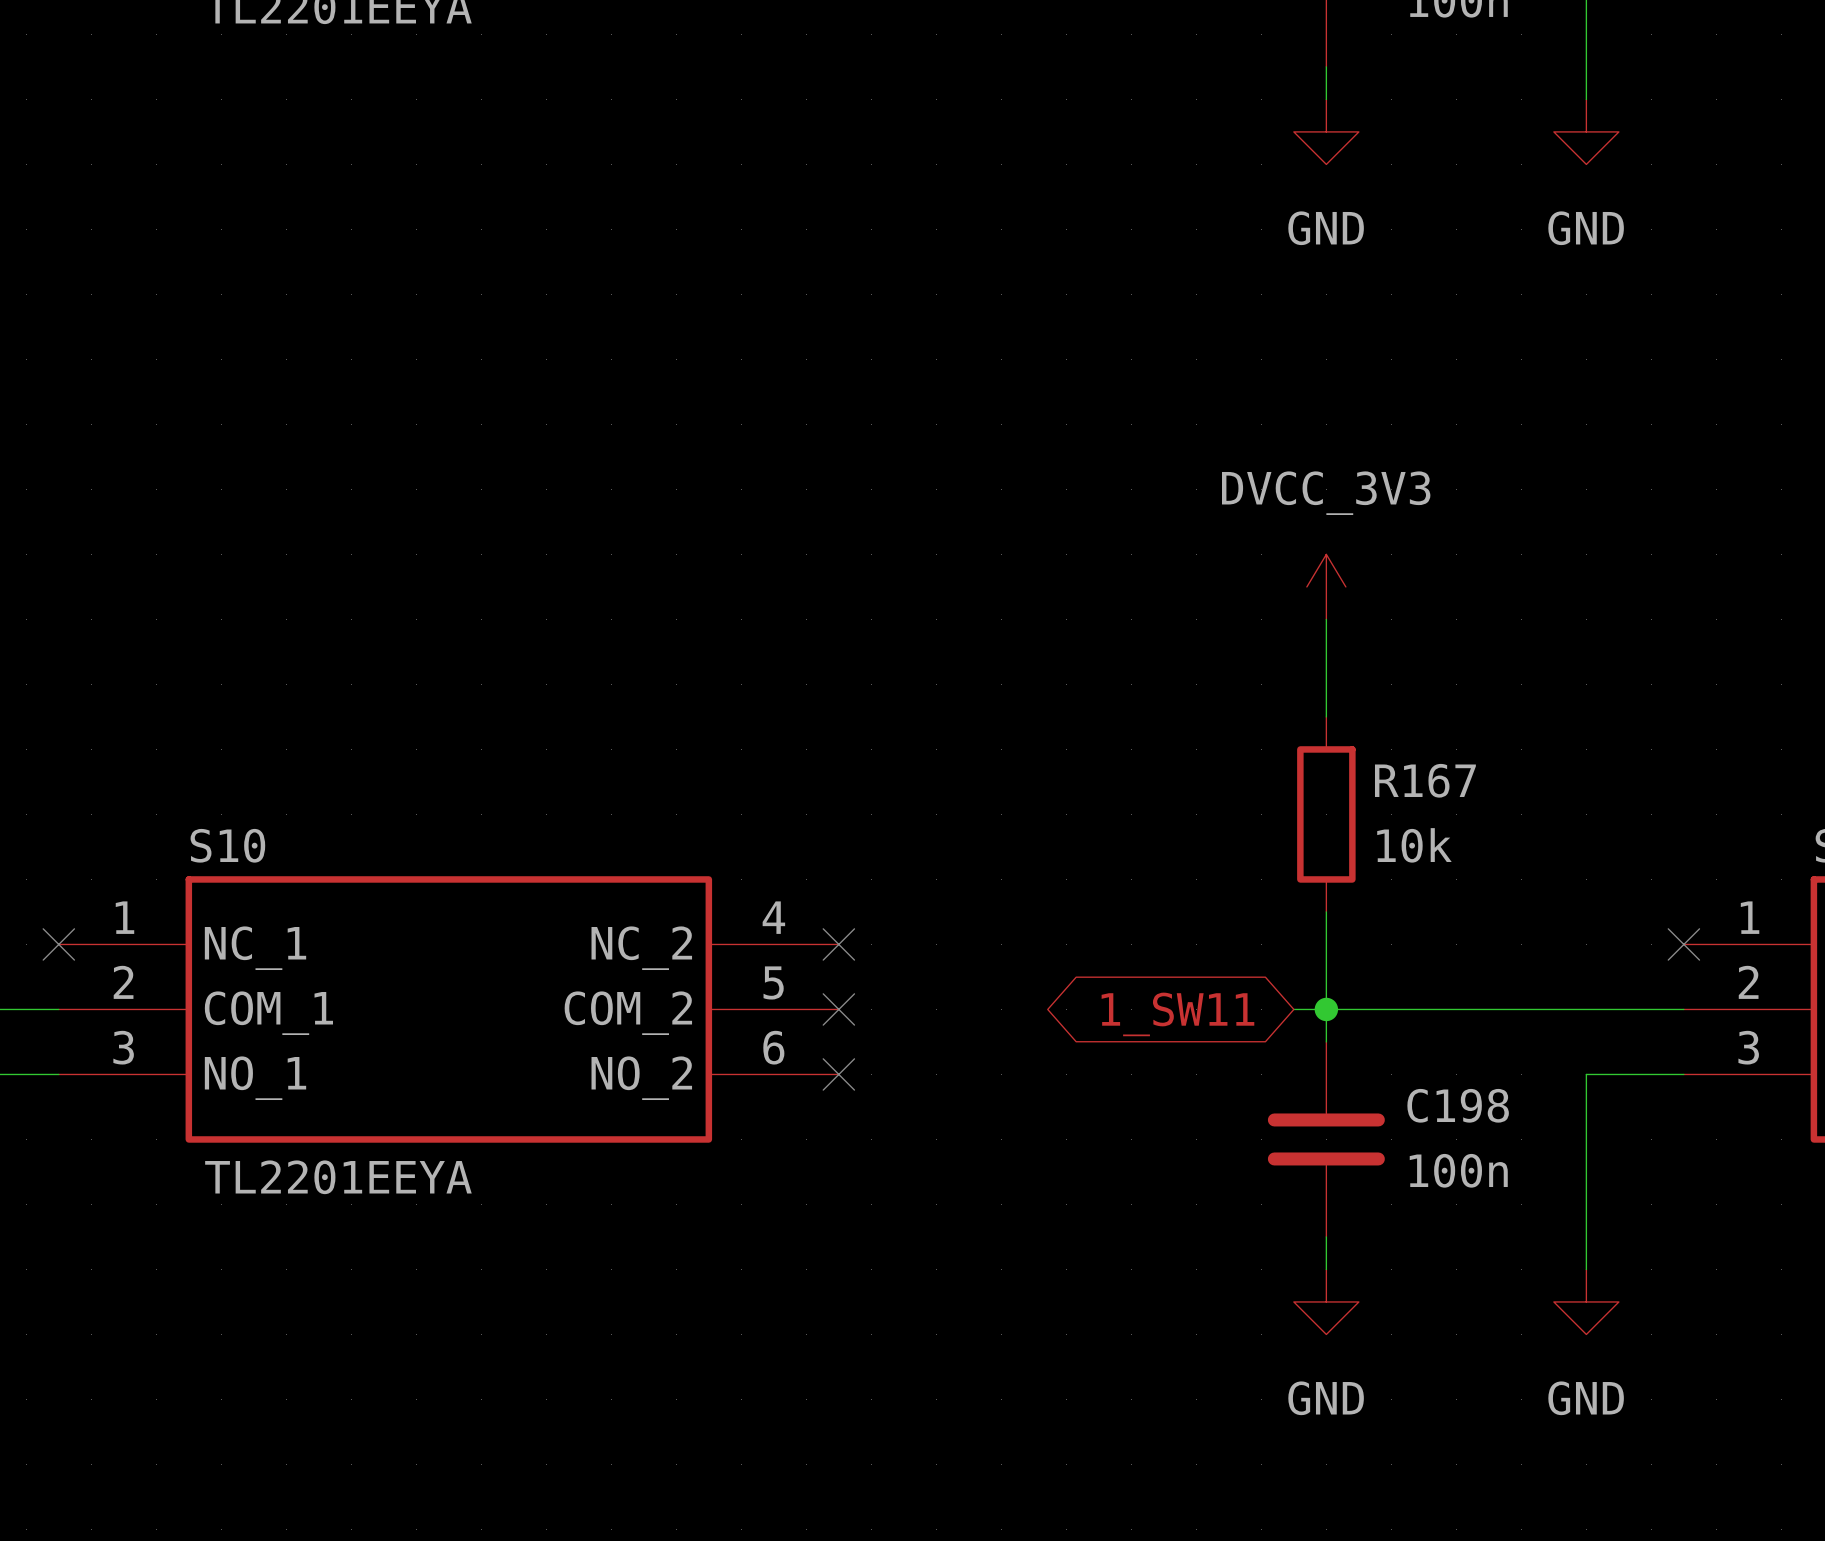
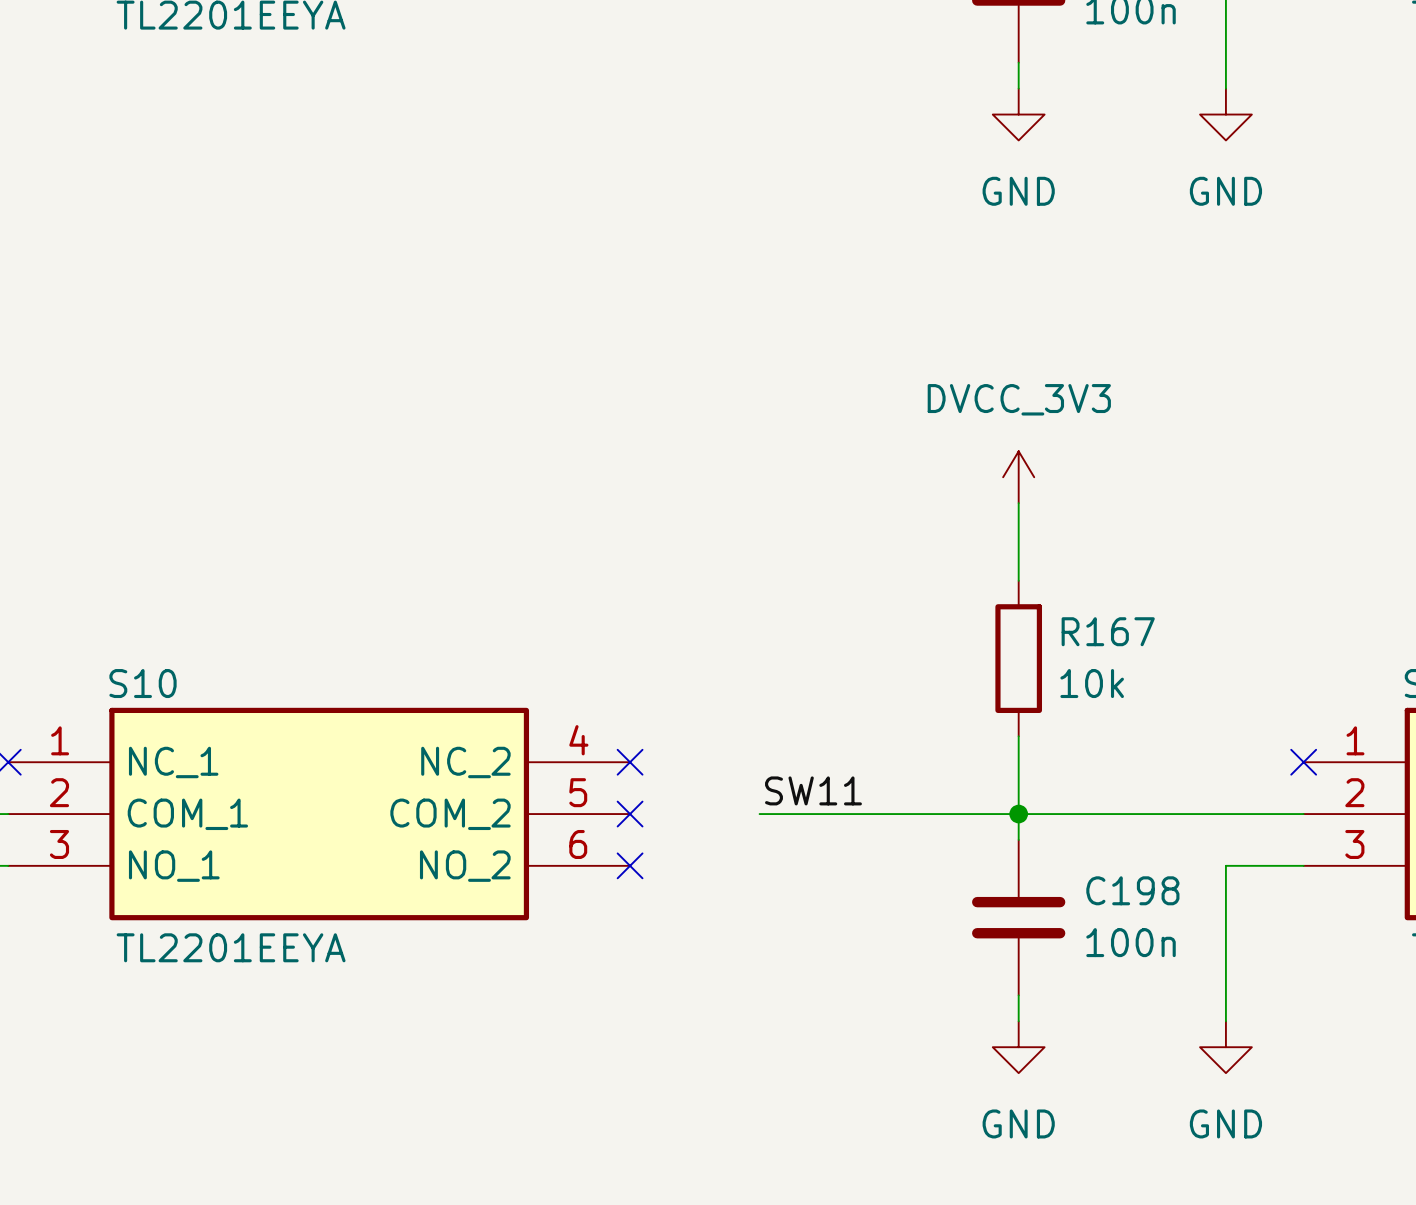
label: none -> SW11 (813, 790)
wire: none -> (759, 814) (992, 814)
global label: 1_SW11 (1177, 1014) -> none

